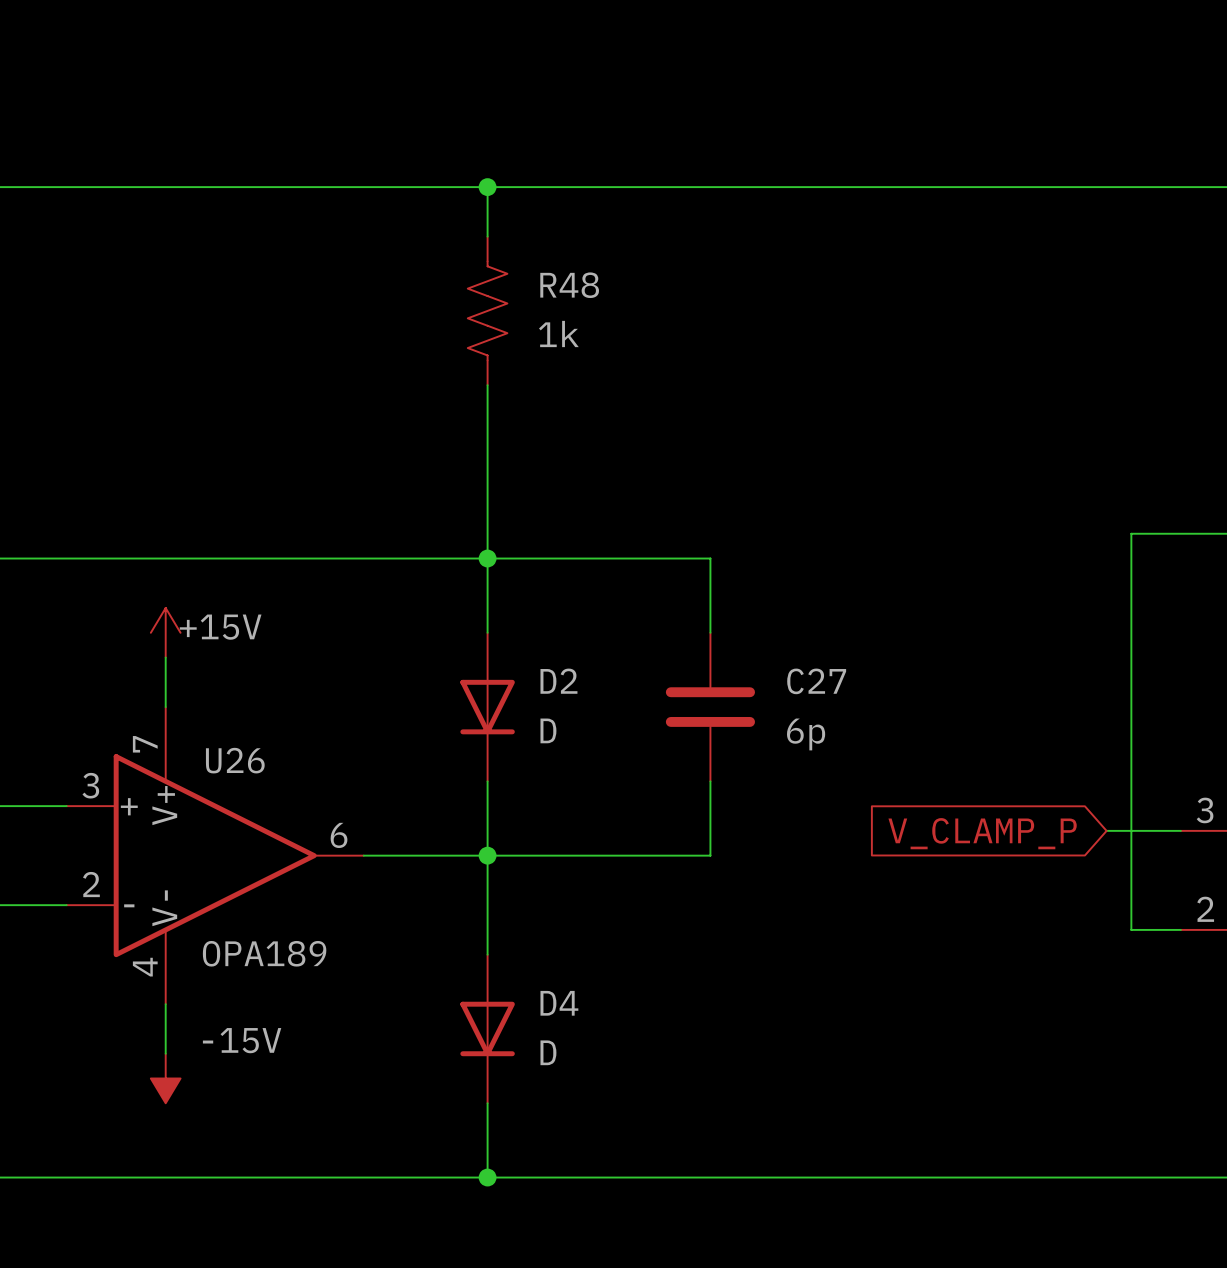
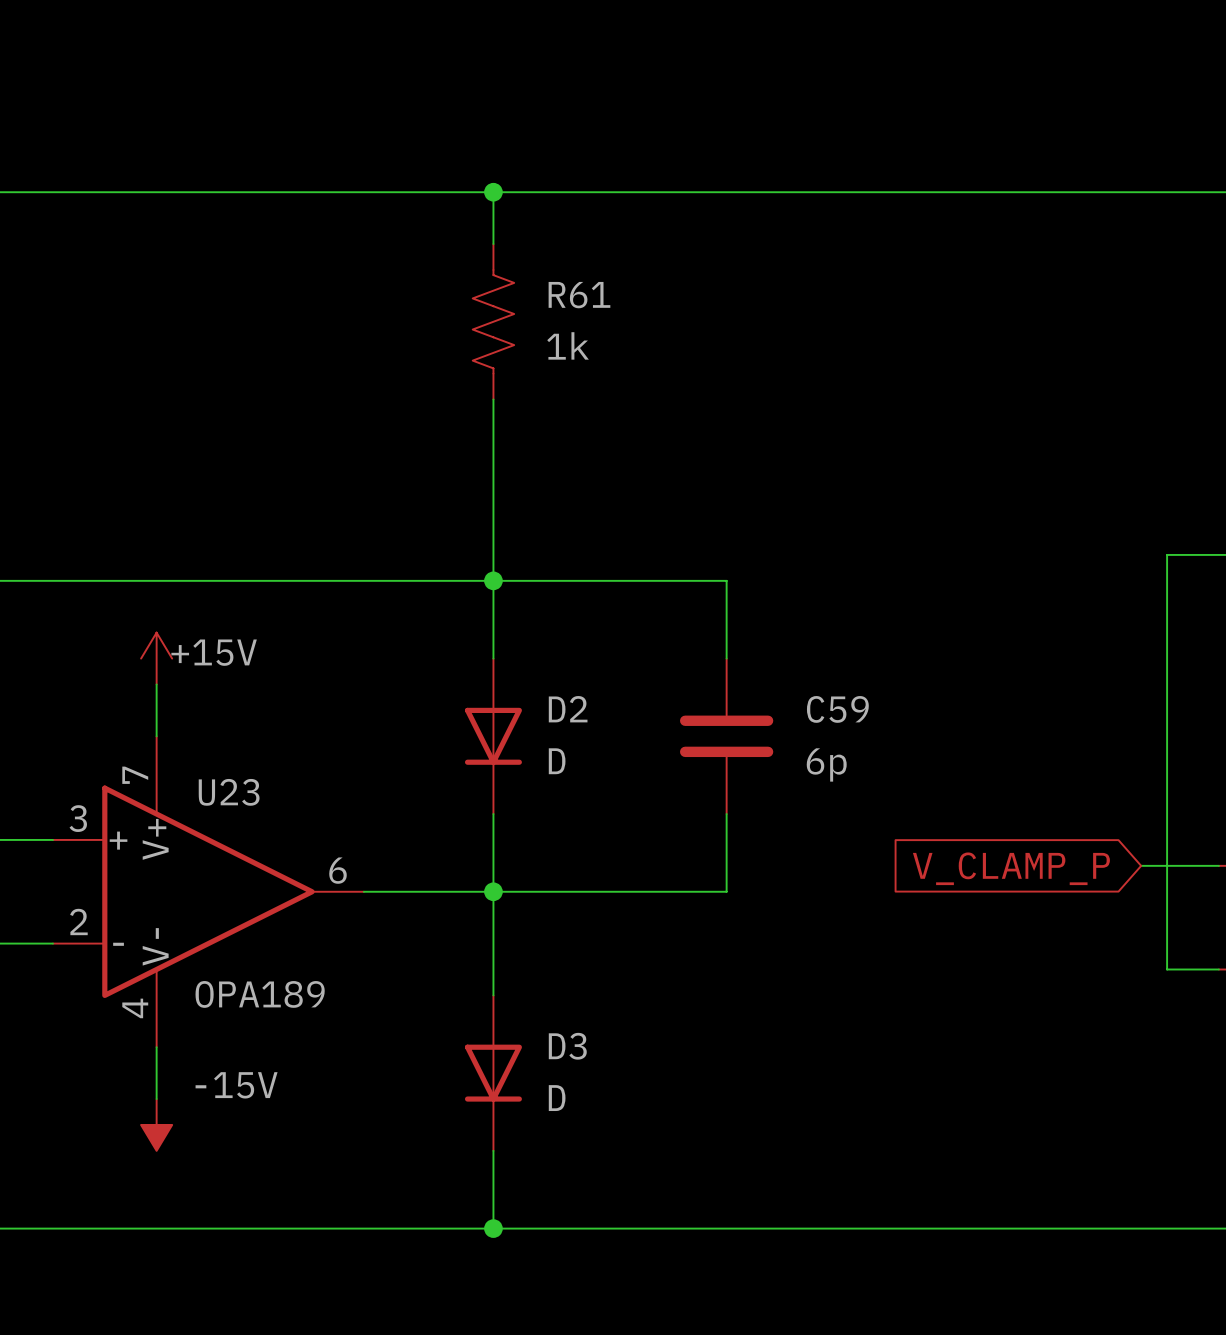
R48 name: R48 (569, 285) -> R61 (579, 295)
C27 name: C27 (816, 681) -> C59 (837, 709)
U26 name: U26 (235, 760) -> U23 (229, 792)
D4 name: D4 (559, 1003) -> D3 (567, 1046)

